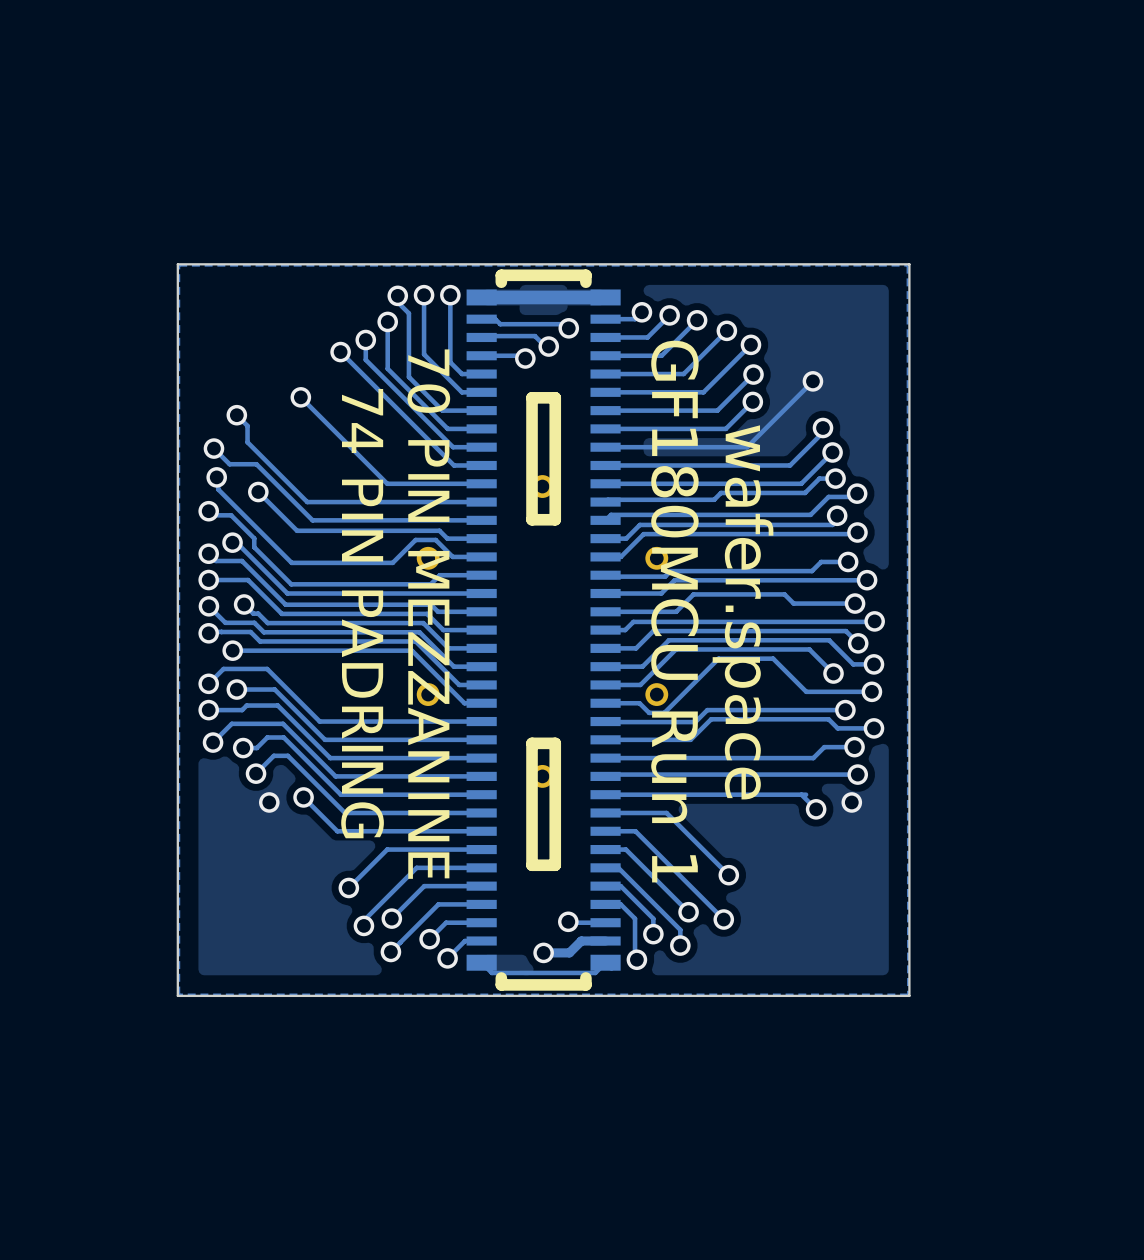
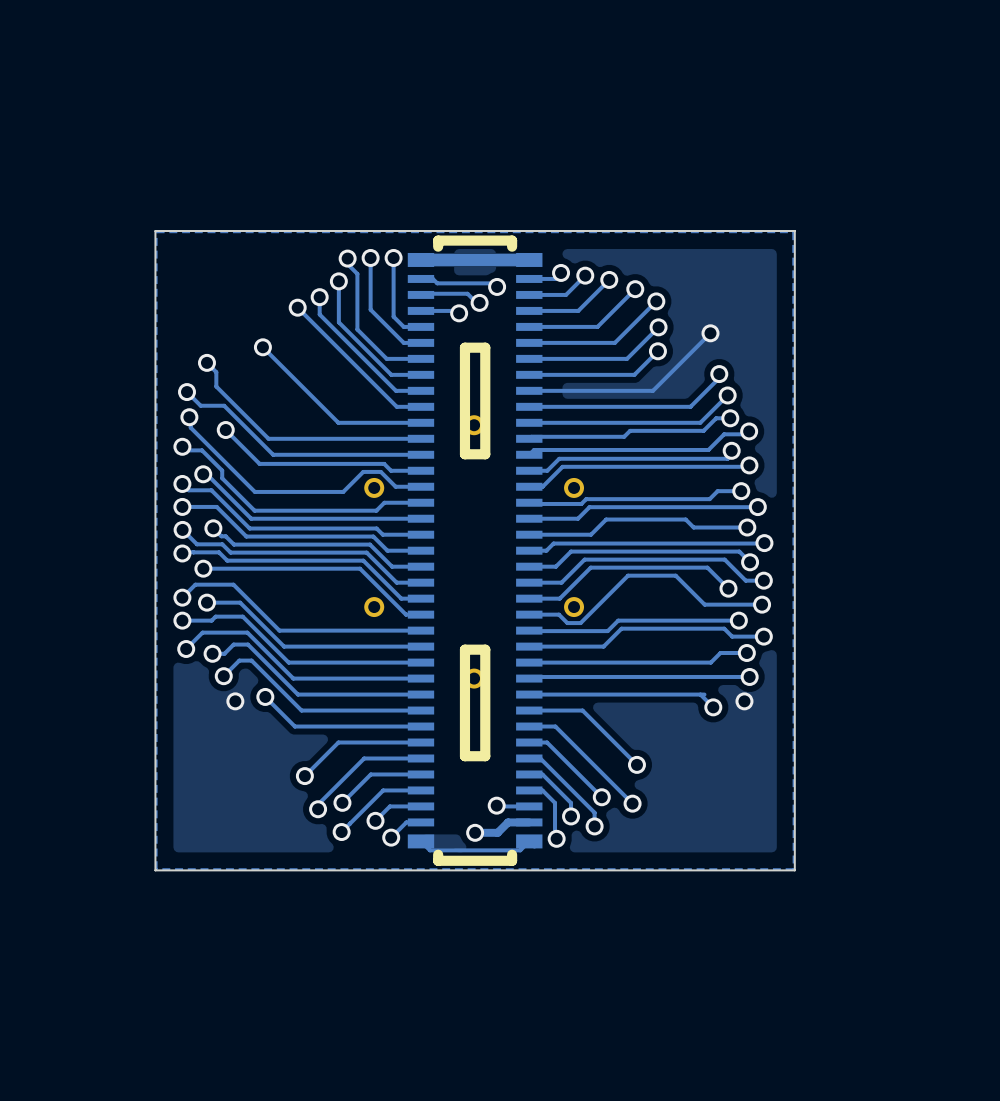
text: GF180MCU Run 1 (674, 611) -> none
text: wafer.space (743, 612) -> none
text: 74 PIN PADRING (362, 613) -> none
text: 70 PIN MEZZANINE (428, 614) -> none

